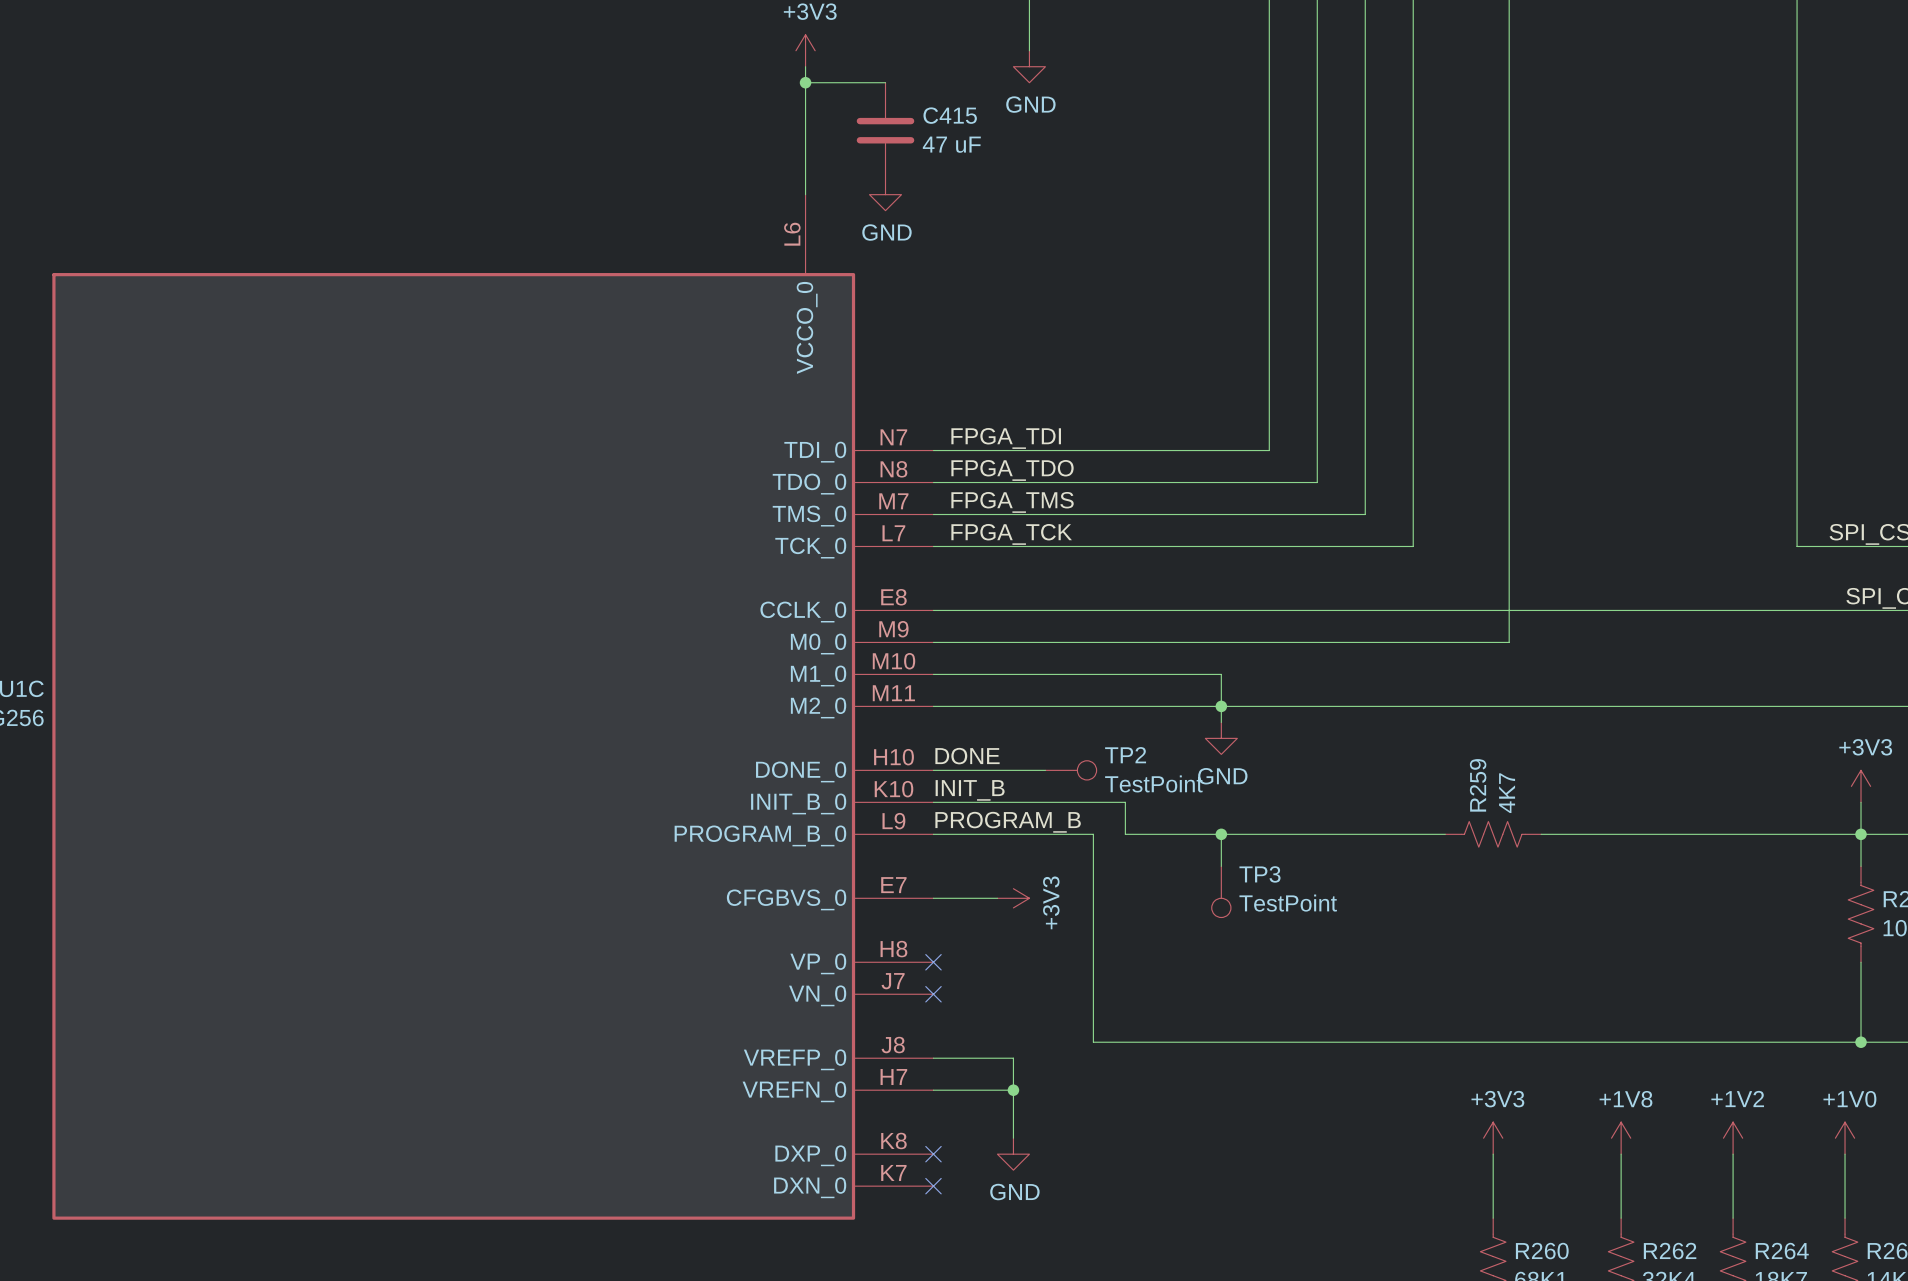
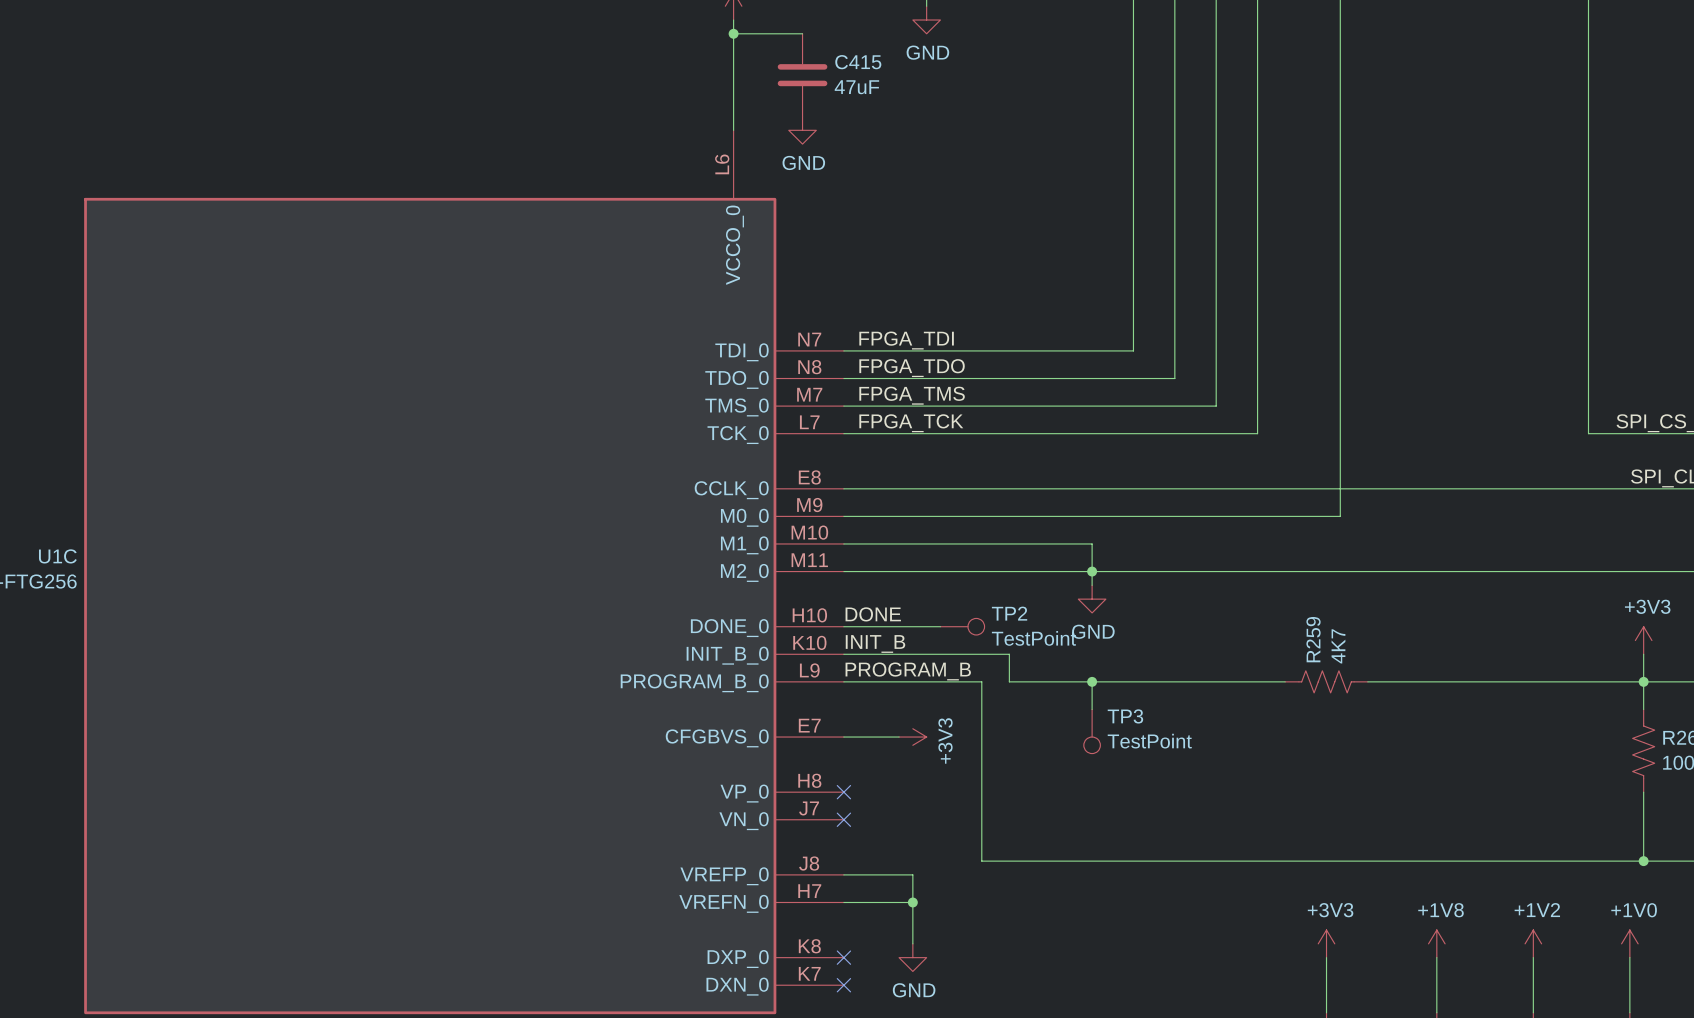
C415 value: 47 uF (951, 144) -> 47uF (856, 87)

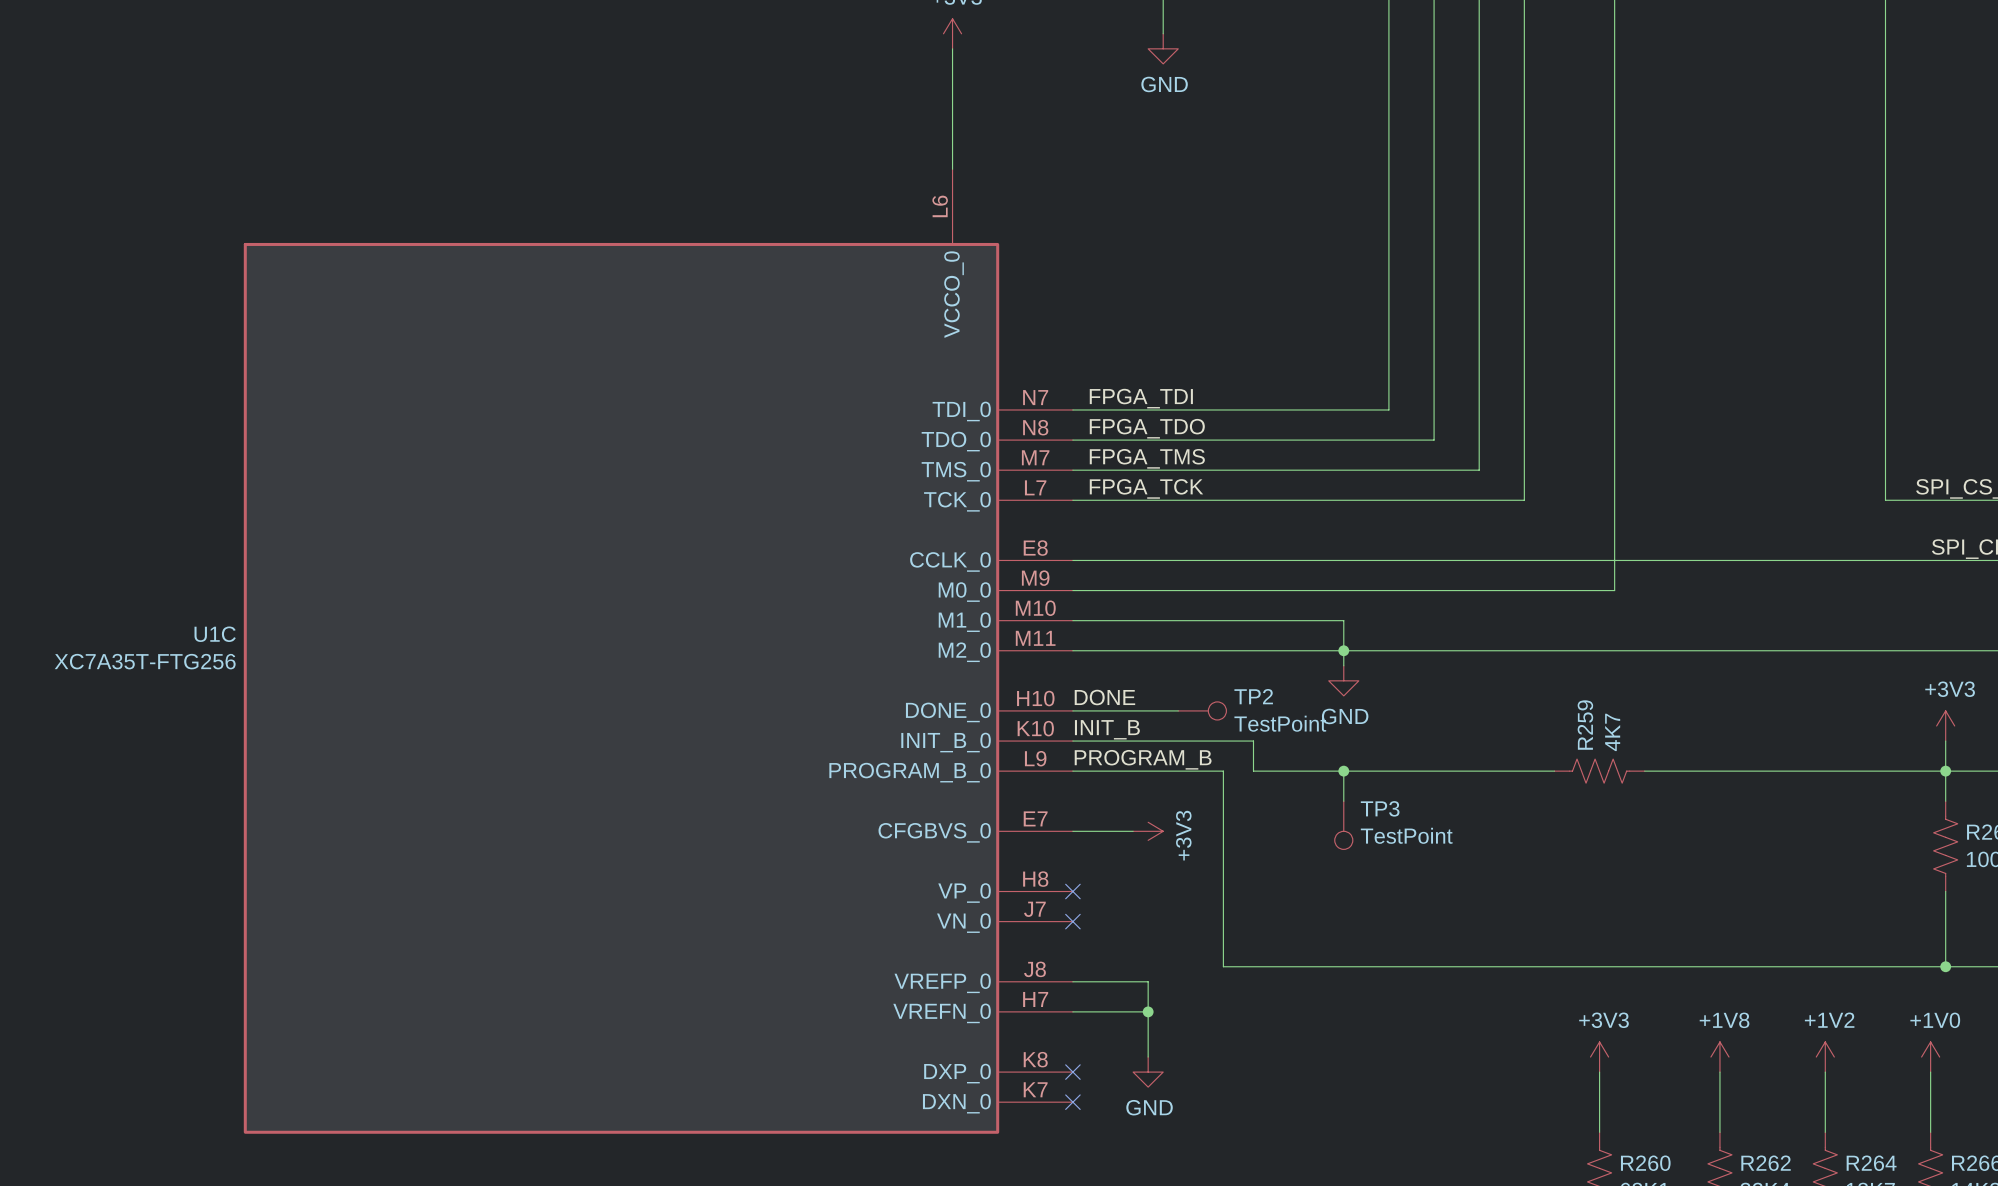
wire: (733, 33) (802, 33) -> none
junction: (733, 33) -> none
C415: 47uF (802, 75) -> none
power symbol: GND (802, 130) -> none

